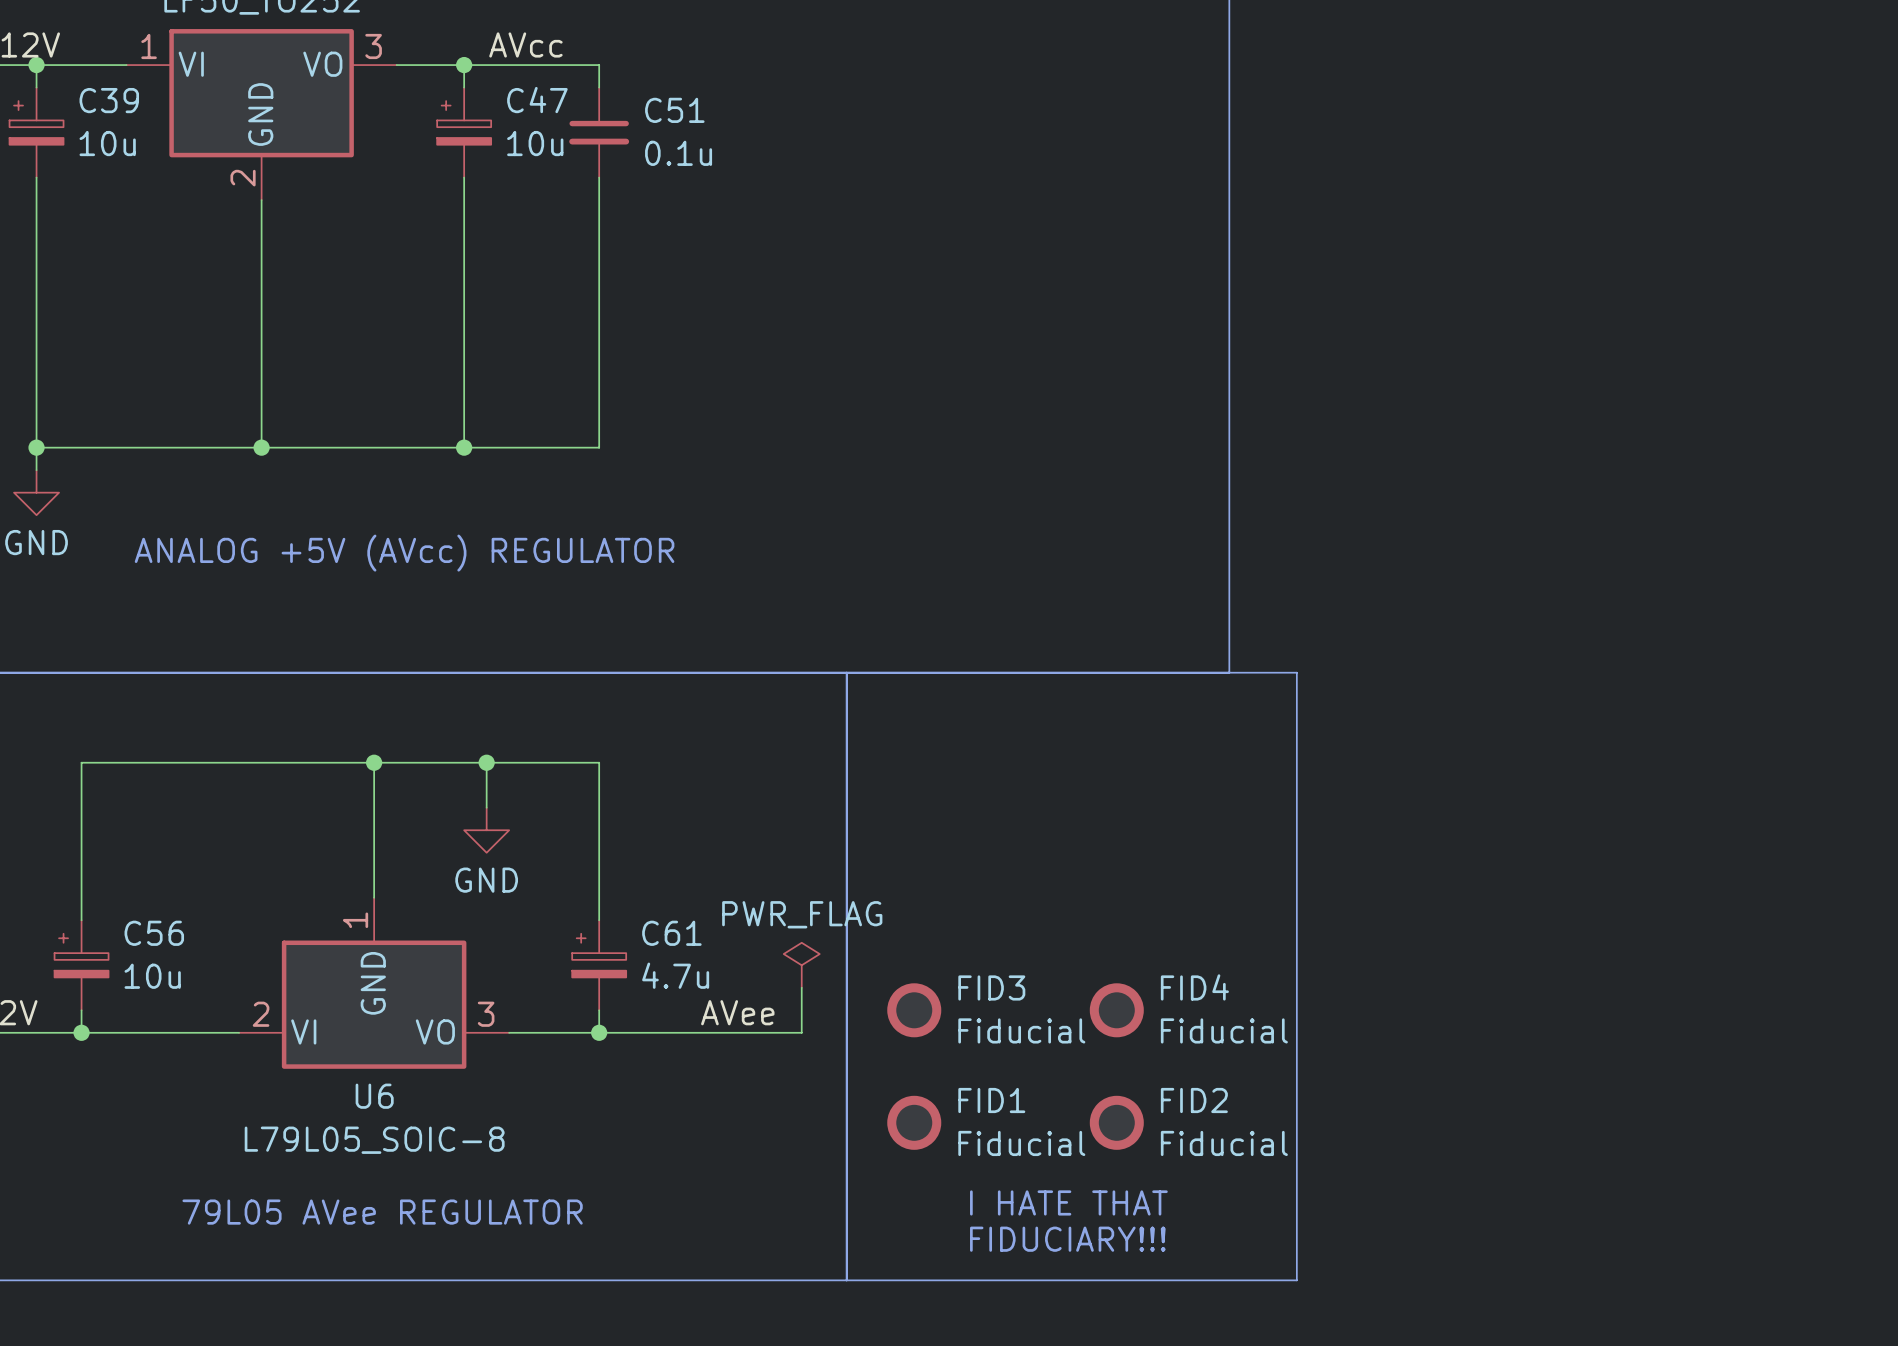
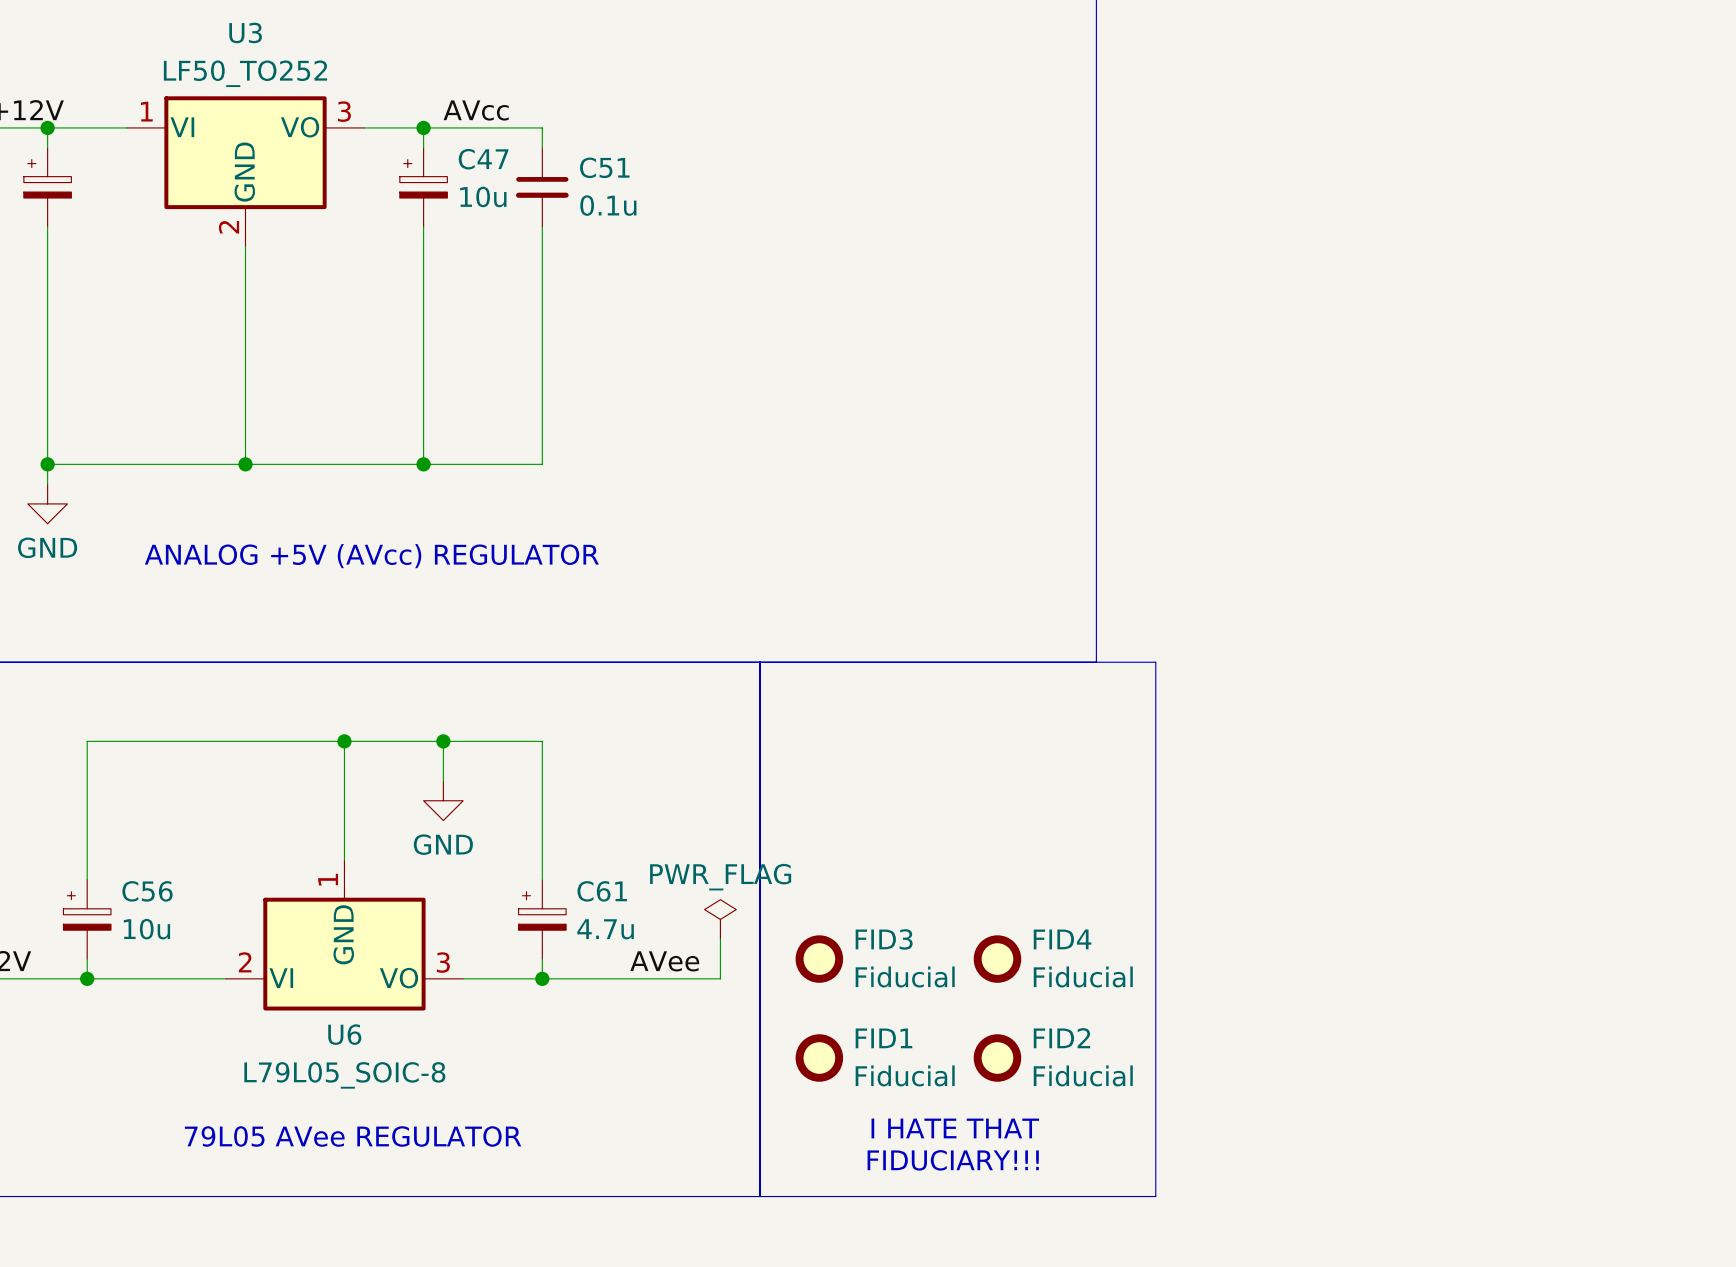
C39 name: C39 (109, 100) -> none
C39 value: 10u (107, 143) -> none

